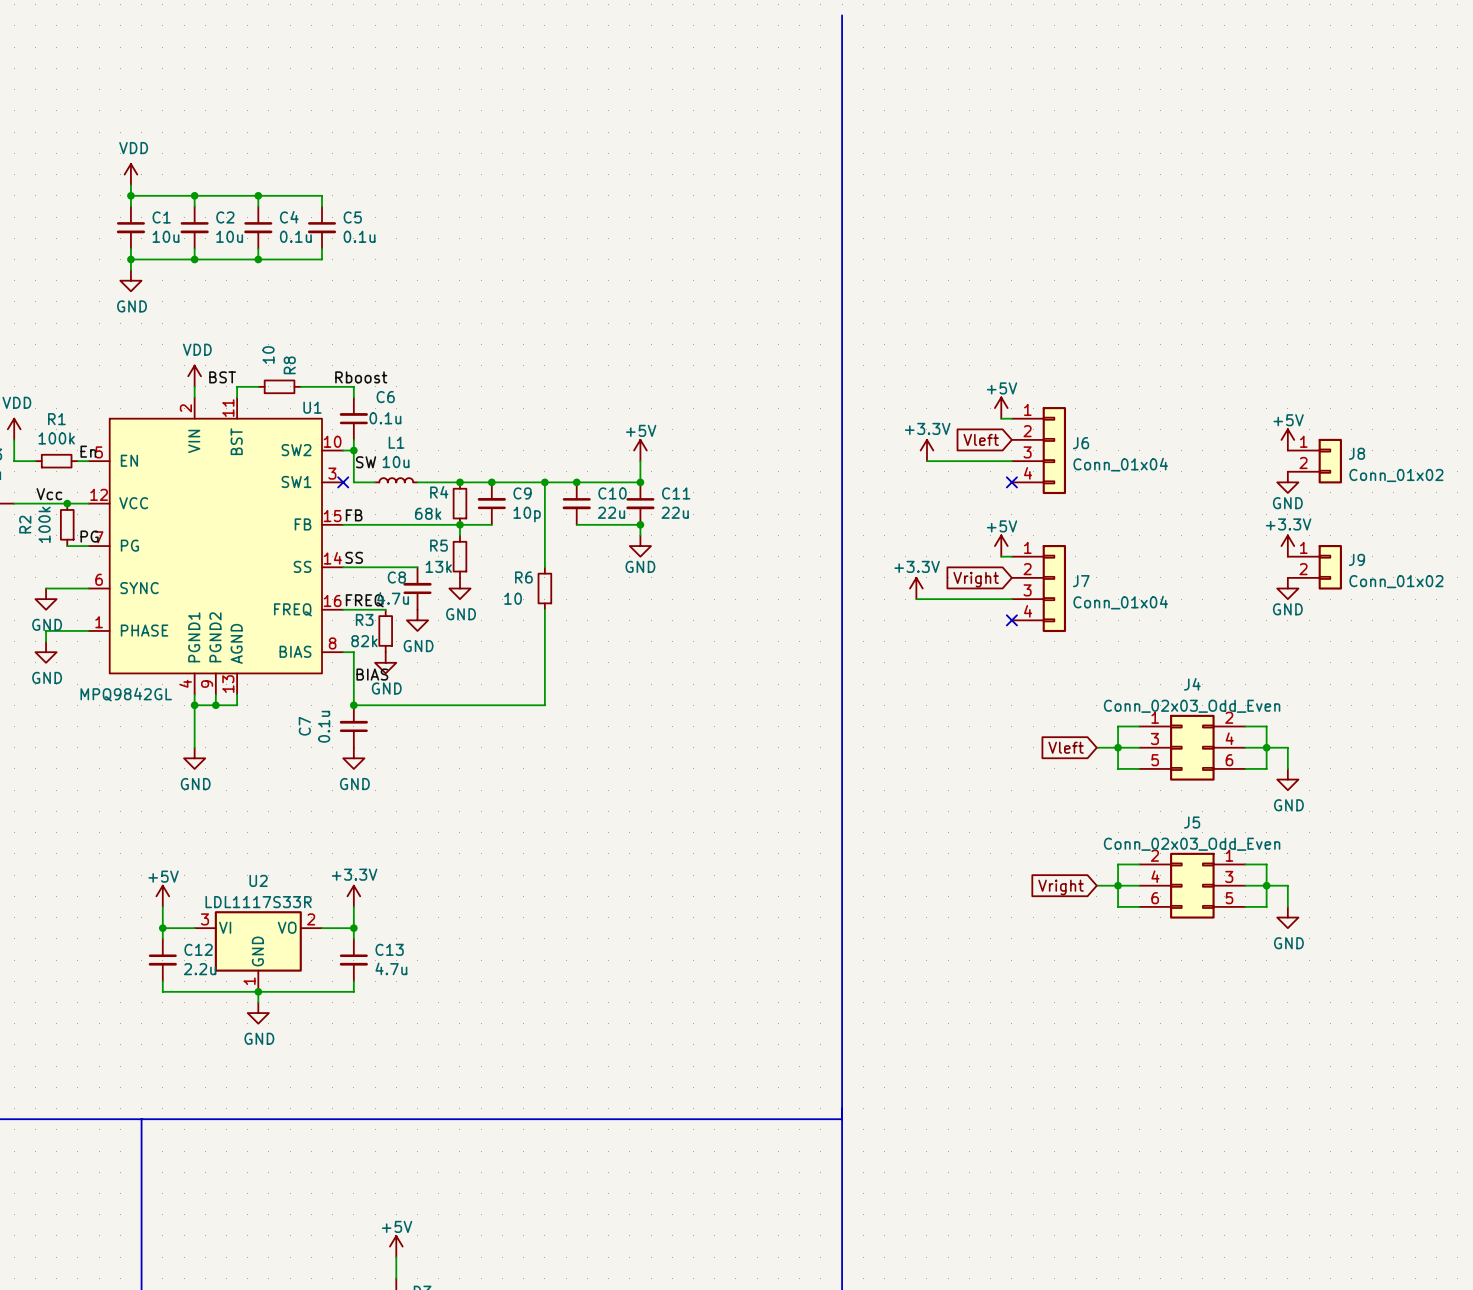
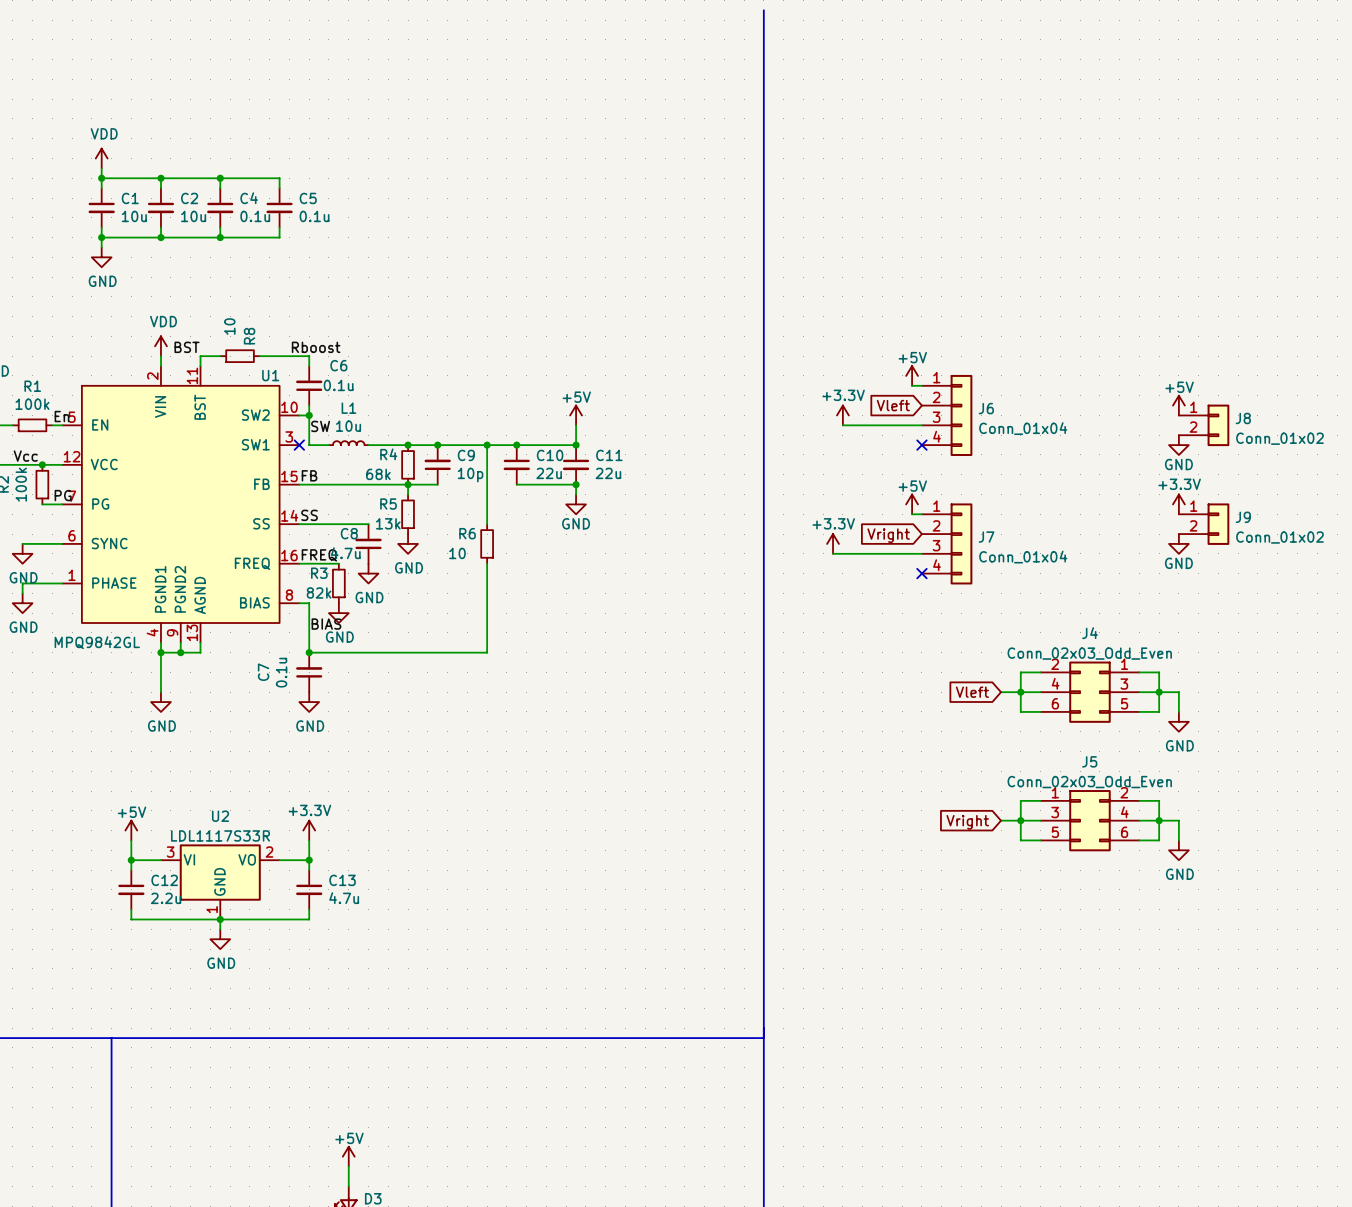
J4 flip: as is (1192, 747) -> left-right (1089, 692)
J5 flip: as is (1192, 885) -> left-right (1089, 820)

